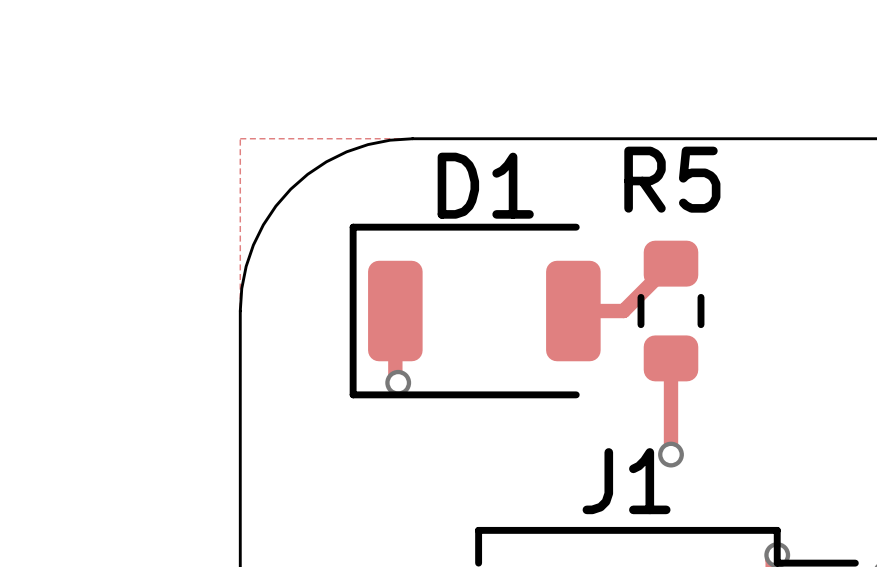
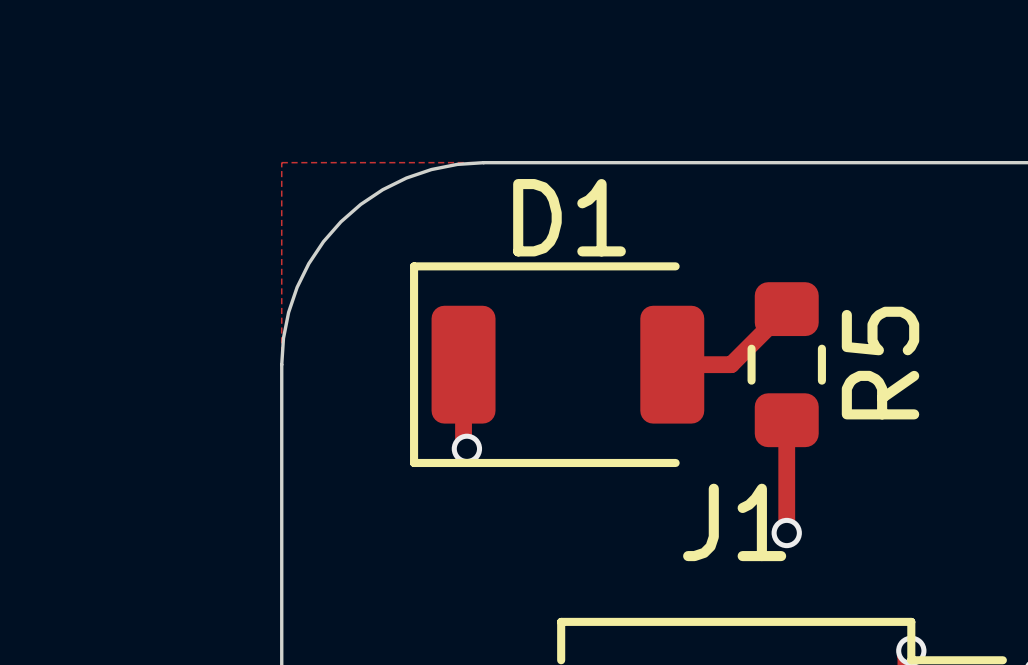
R5 name rotation: 0° (672, 179) -> 90° counterclockwise (880, 363)
R5 name position: R5 (672, 179) -> R5 (880, 363)
J1 name position: J1 (626, 481) -> J1 (734, 522)

